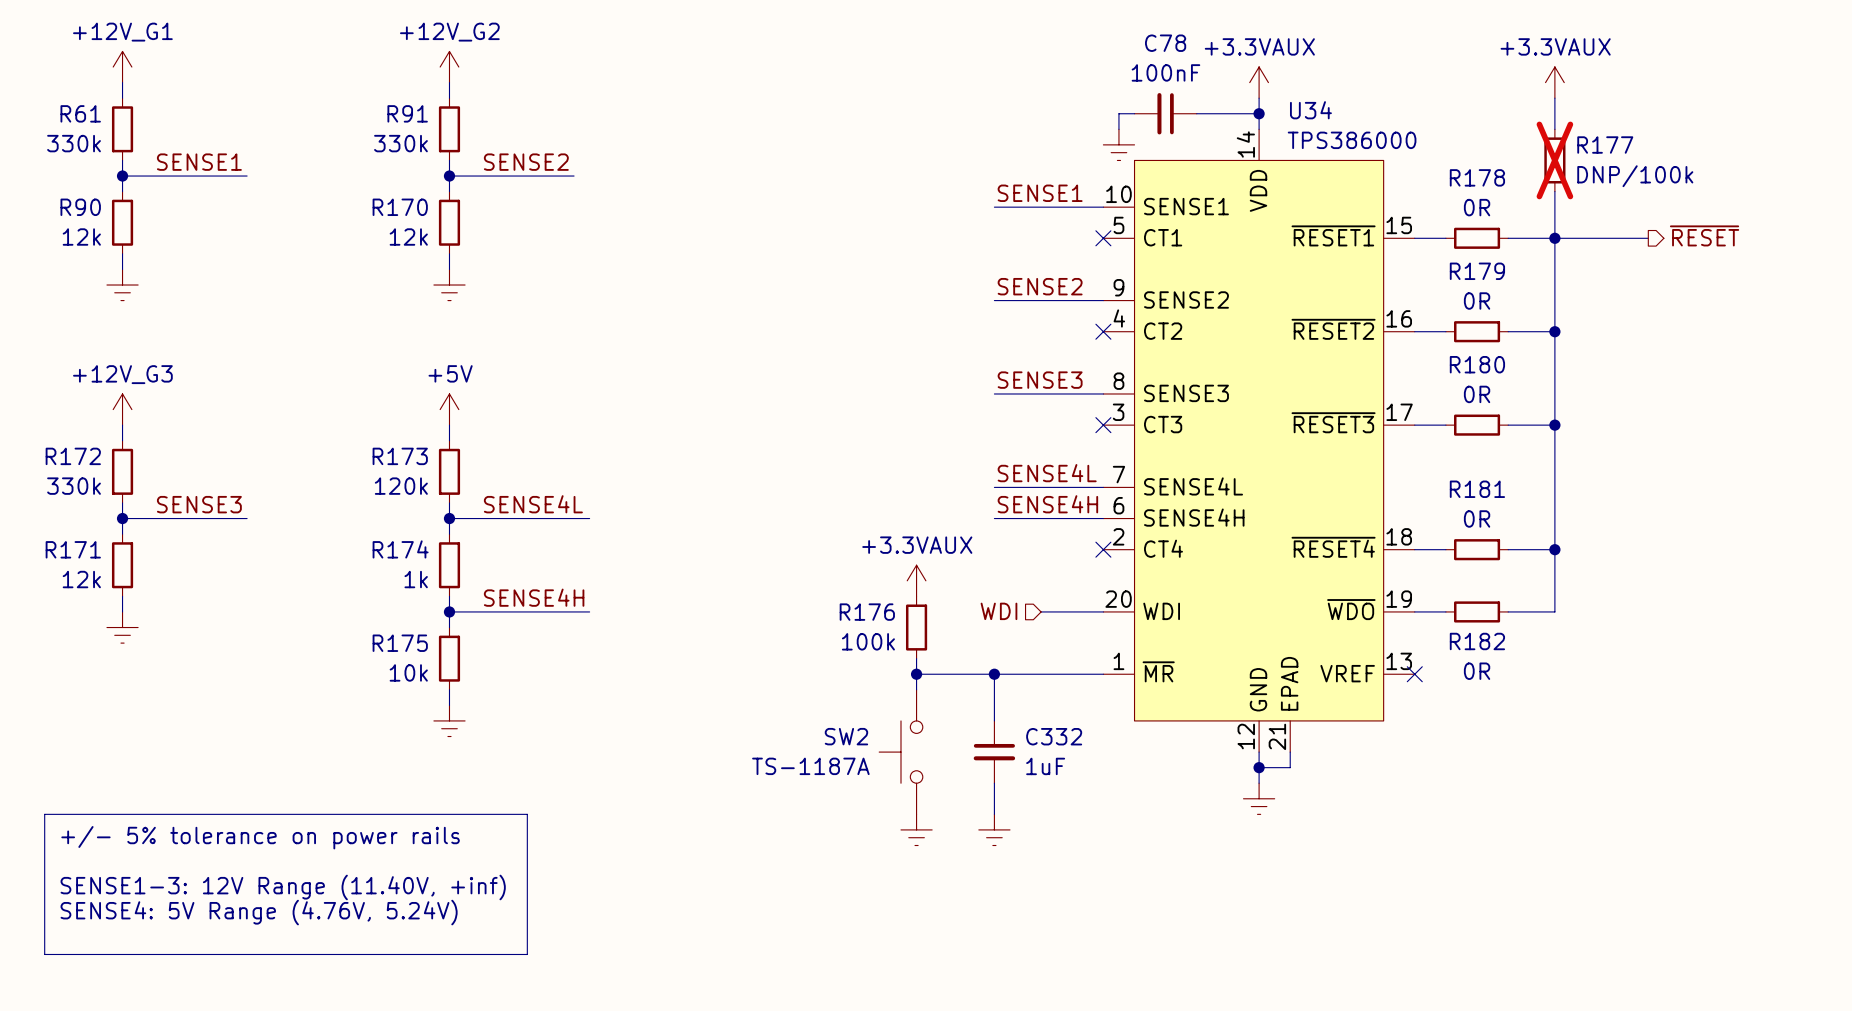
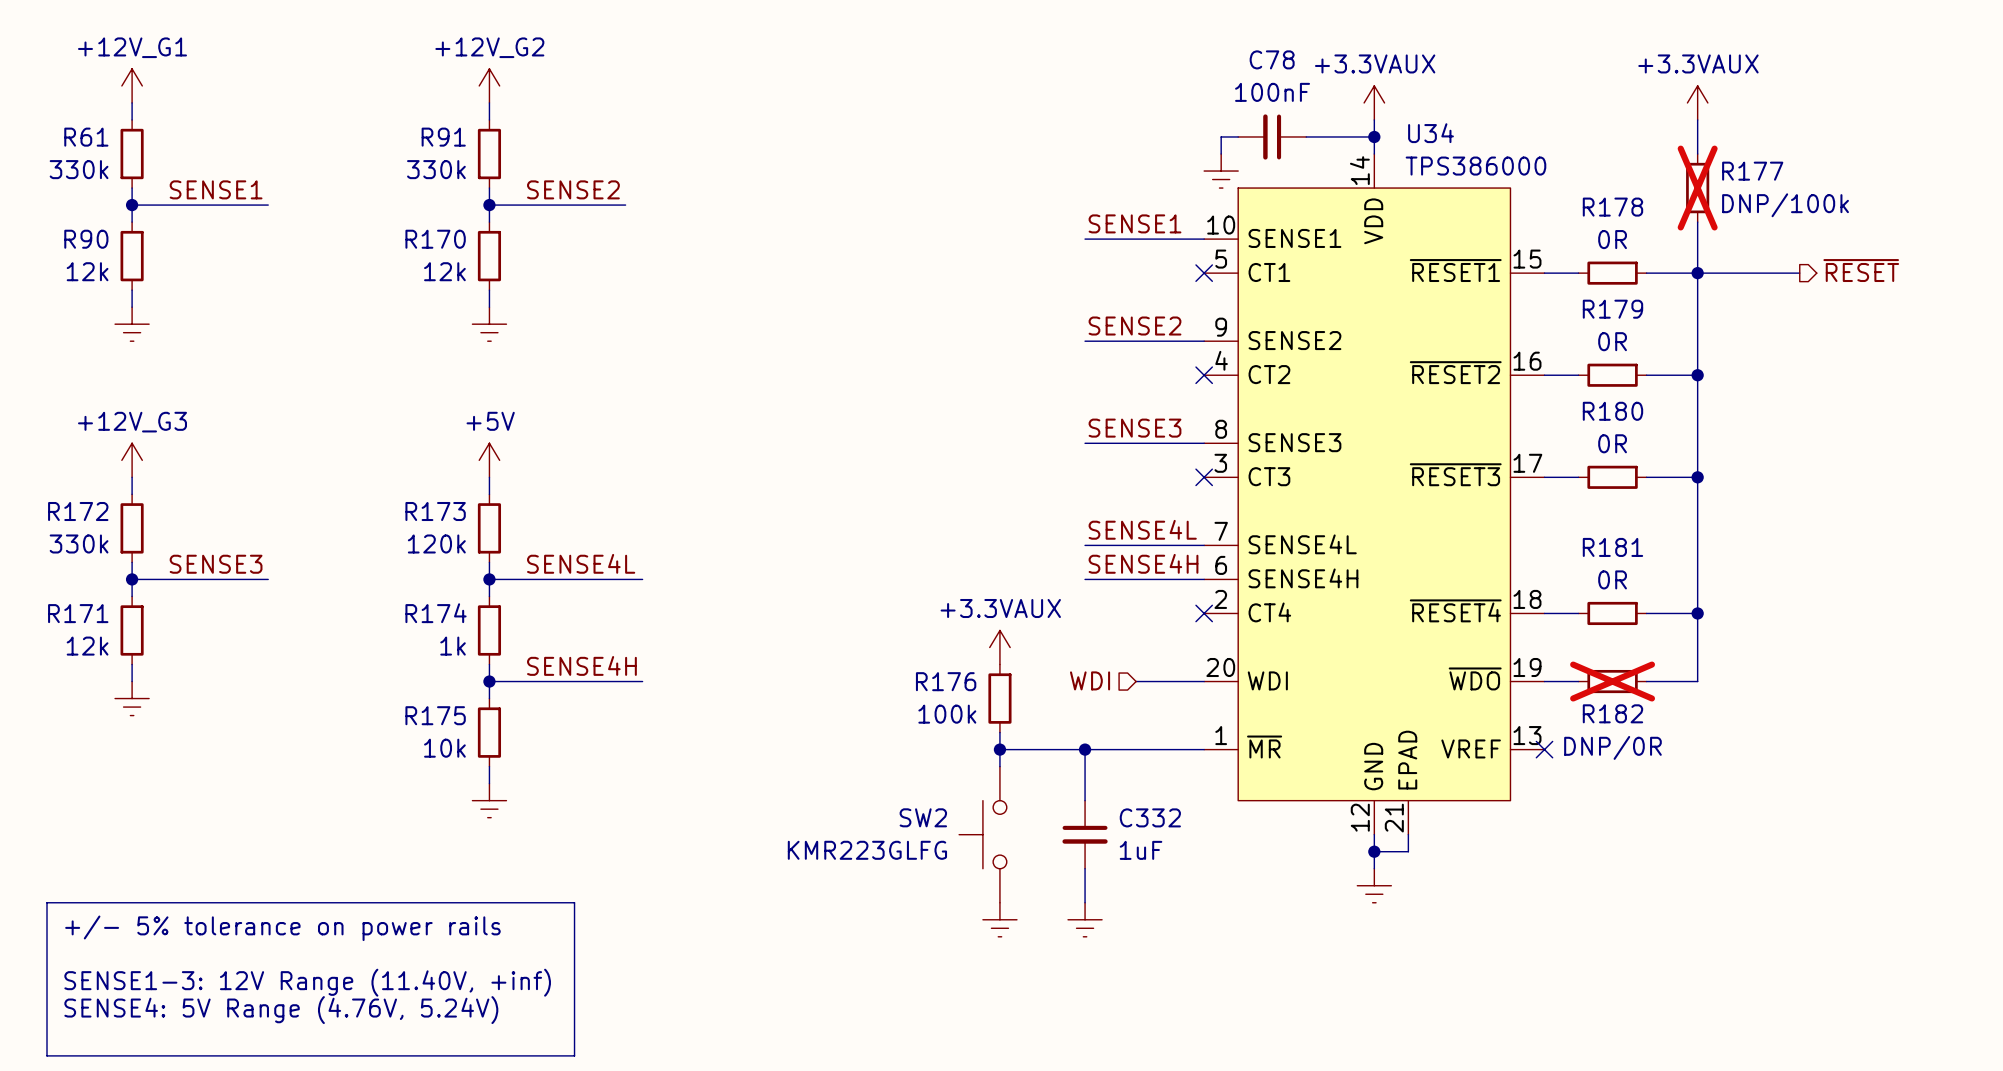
R182 do-not-place cross: none -> (1612, 681)
R182 value: 0R (1477, 671) -> DNP/0R (1612, 747)
SW2 value: TS-1187A (810, 766) -> KMR223GLFG (867, 850)

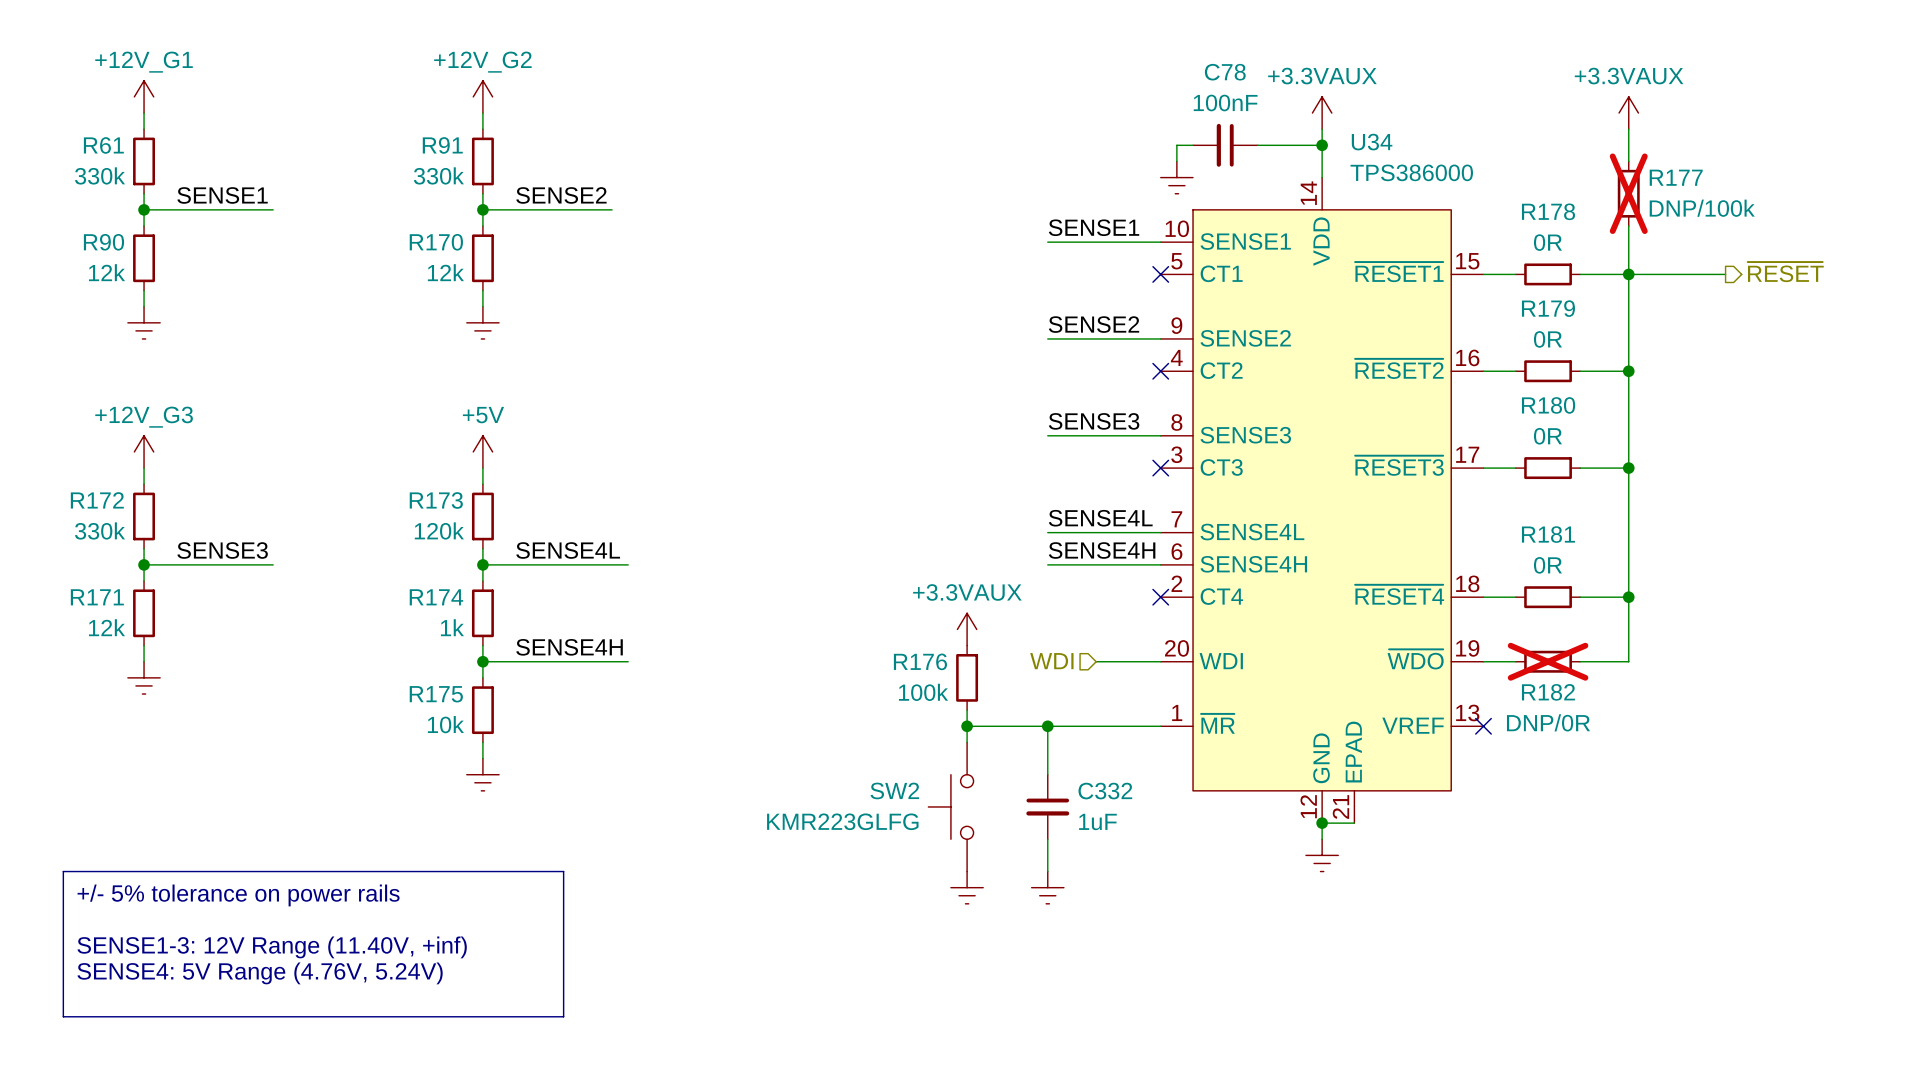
U34 symbol: [1204, 154, 1545, 835] -> [1160, 177, 1484, 824]

